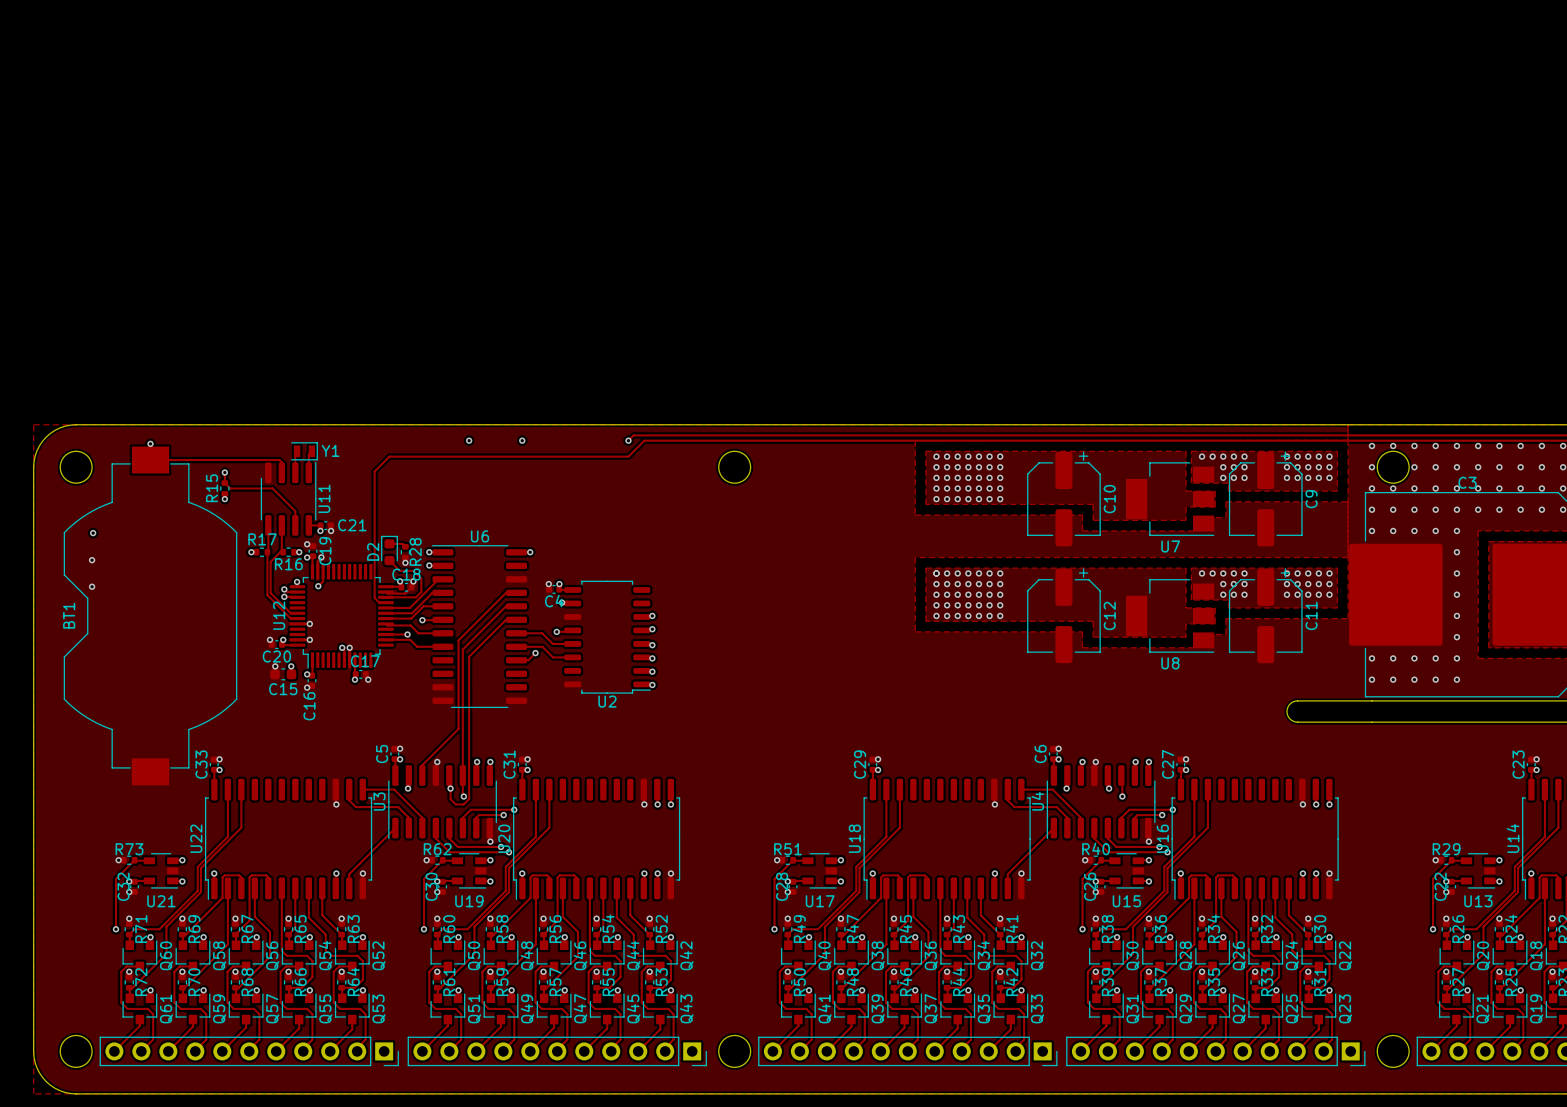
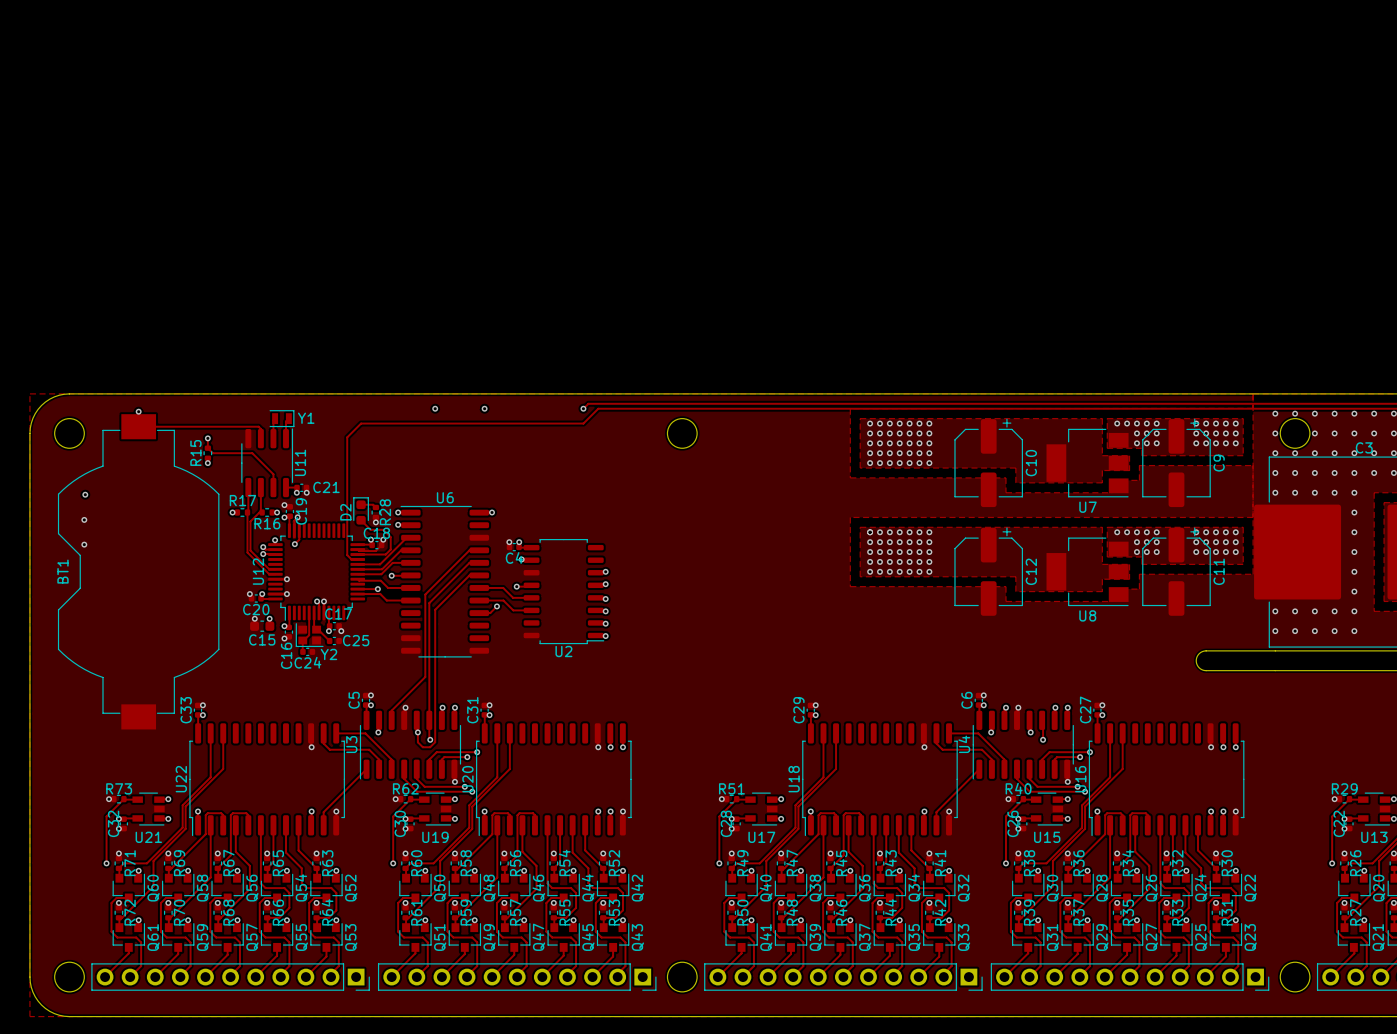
track: none -> (309, 612) (309, 635) (302, 640) (302, 651)
track: none -> (314, 612) (314, 627) (329, 641)
Y2: none -> (309, 635)
C25: none -> (334, 641)
C24: none -> (307, 651)

